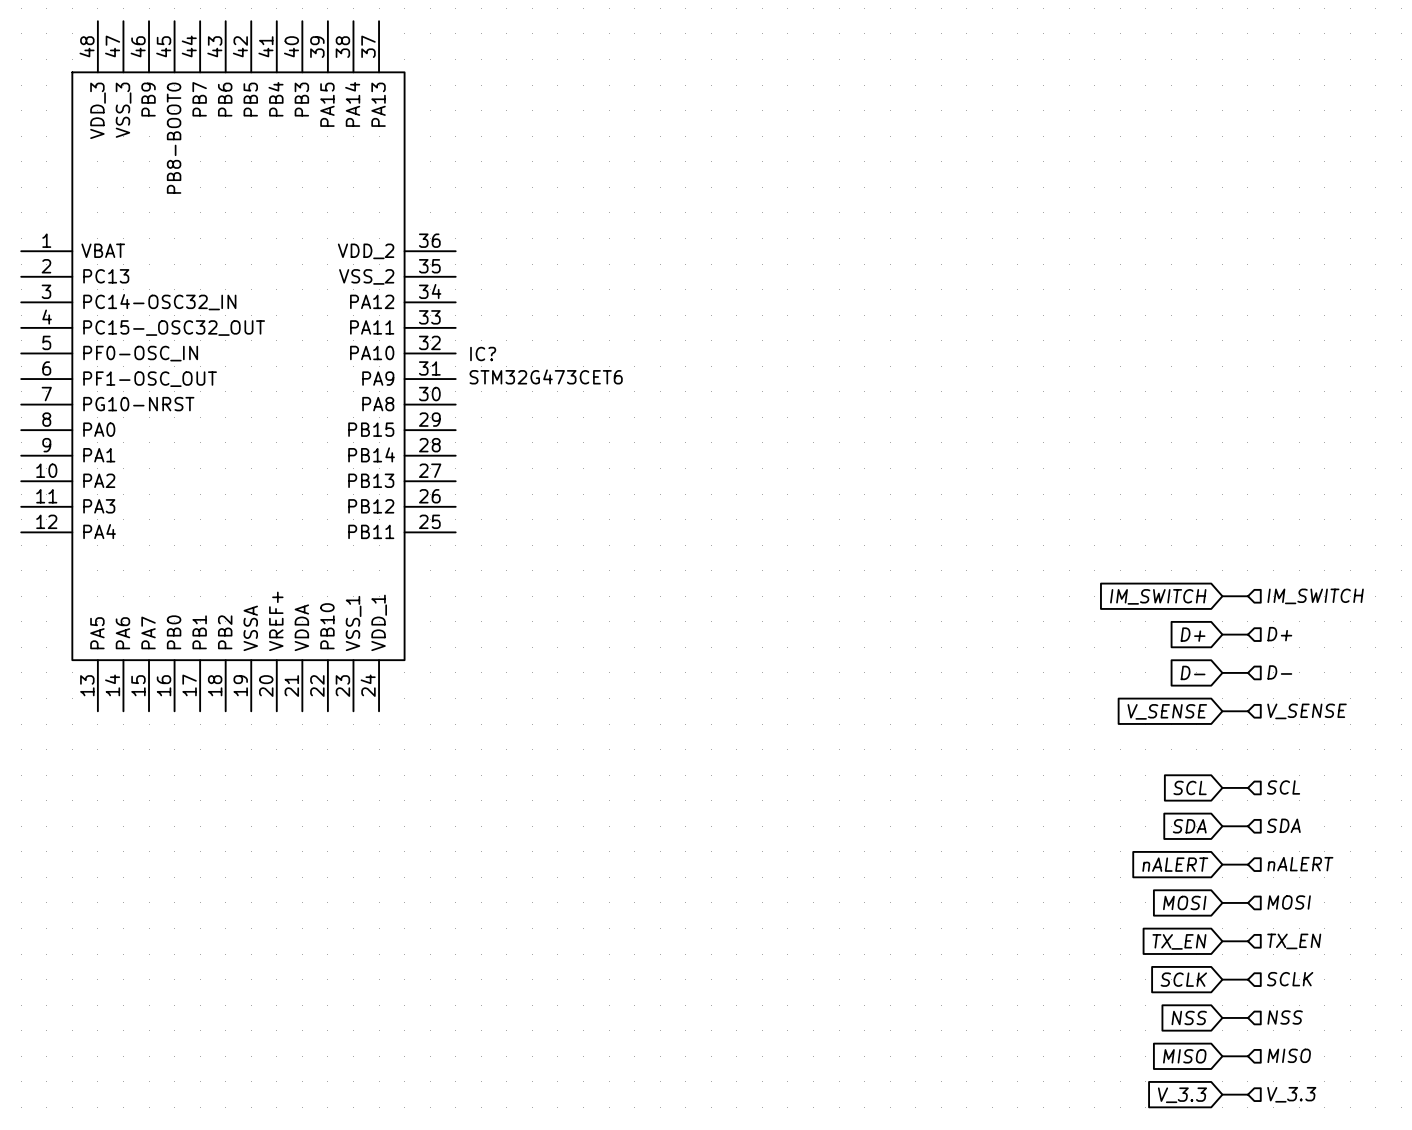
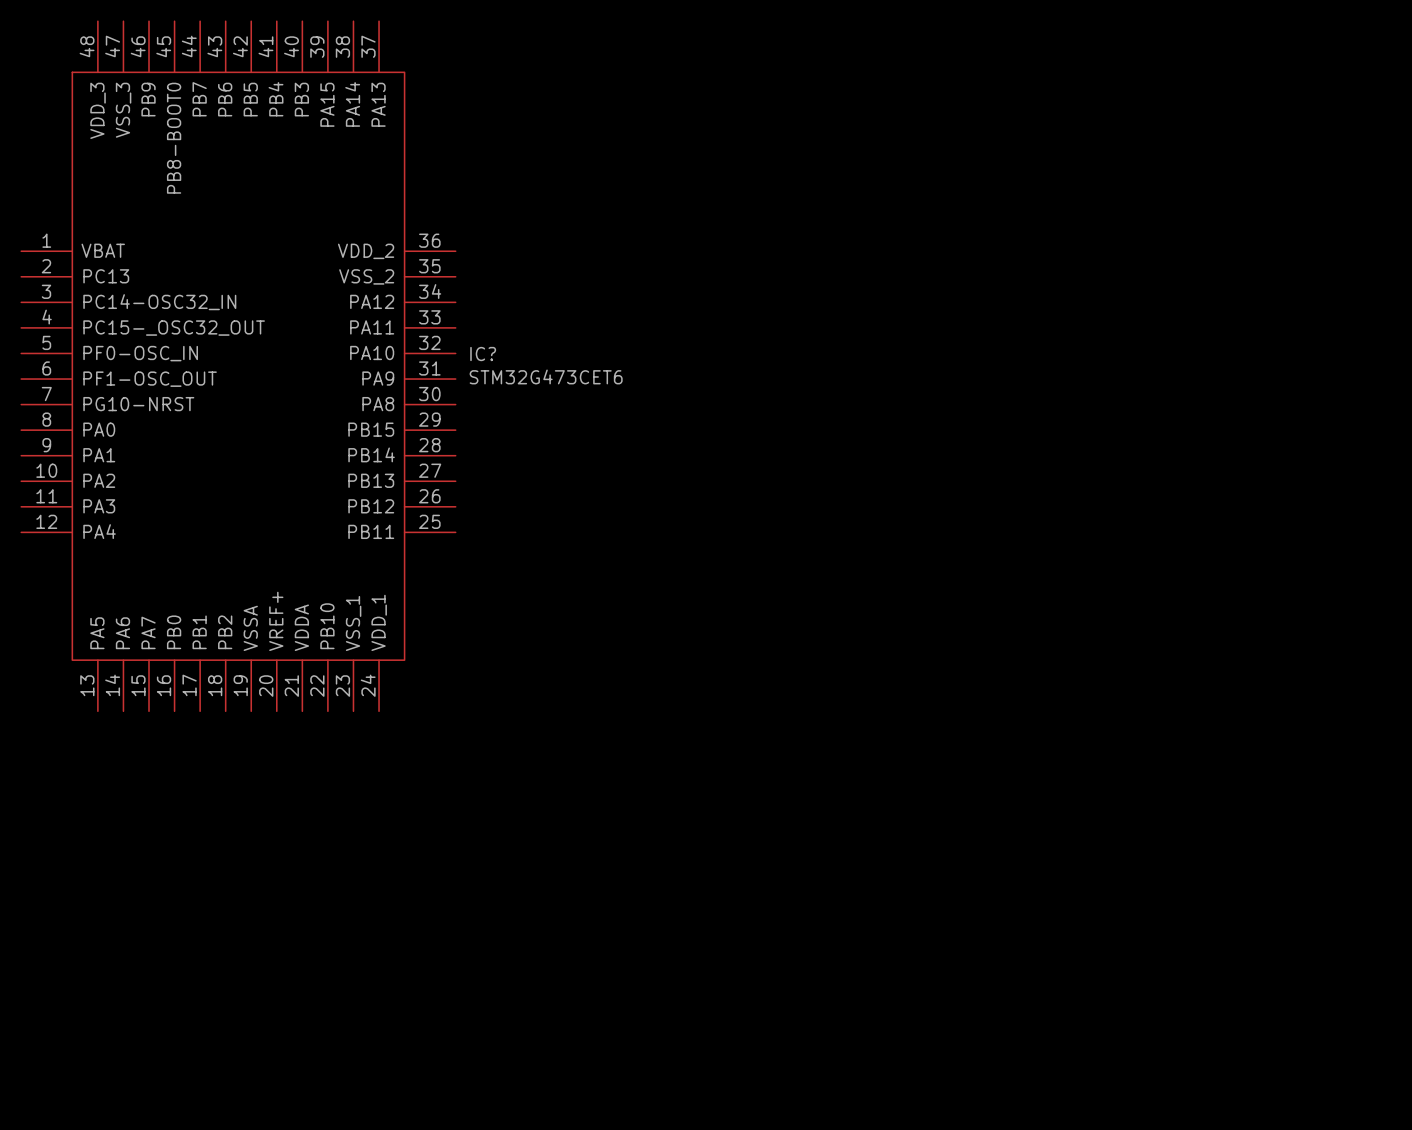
global label: IM_SWITCH (1158, 596) -> none
wire: (1222, 596) (1247, 596) -> none
hierarchical label: IM_SWITCH (1315, 596) -> none
global label: D+ (1193, 634) -> none
wire: (1222, 634) (1247, 634) -> none
hierarchical label: D+ (1279, 634) -> none
global label: D- (1193, 672) -> none
wire: (1222, 672) (1247, 672) -> none
hierarchical label: D- (1279, 672) -> none
global label: V_SENSE (1167, 711) -> none
wire: (1222, 711) (1247, 711) -> none
hierarchical label: V_SENSE (1306, 711) -> none
global label: SCL (1190, 787) -> none
wire: (1222, 787) (1247, 787) -> none
hierarchical label: SCL (1283, 787) -> none
hierarchical label: SDA (1283, 825) -> none
global label: SDA (1189, 826) -> none
wire: (1222, 826) (1247, 826) -> none
global label: nALERT (1175, 864) -> none
wire: (1222, 864) (1247, 864) -> none
hierarchical label: nALERT (1300, 864) -> none
global label: MOSI (1184, 902) -> none
wire: (1222, 902) (1247, 902) -> none
hierarchical label: MOSI (1289, 902) -> none
global label: TX_EN (1179, 941) -> none
wire: (1222, 941) (1247, 941) -> none
hierarchical label: TX_EN (1294, 941) -> none
global label: SCLK (1183, 979) -> none
wire: (1222, 979) (1247, 979) -> none
hierarchical label: SCLK (1290, 979) -> none
global label: NSS (1189, 1017) -> none
wire: (1222, 1017) (1247, 1017) -> none
hierarchical label: NSS (1285, 1017) -> none
hierarchical label: MISO (1289, 1055) -> none
global label: MISO (1184, 1056) -> none
wire: (1222, 1056) (1247, 1056) -> none
wire: (1222, 1094) (1247, 1094) -> none
hierarchical label: V_3.3 (1291, 1094) -> none
global label: V_3.3 (1182, 1095) -> none

